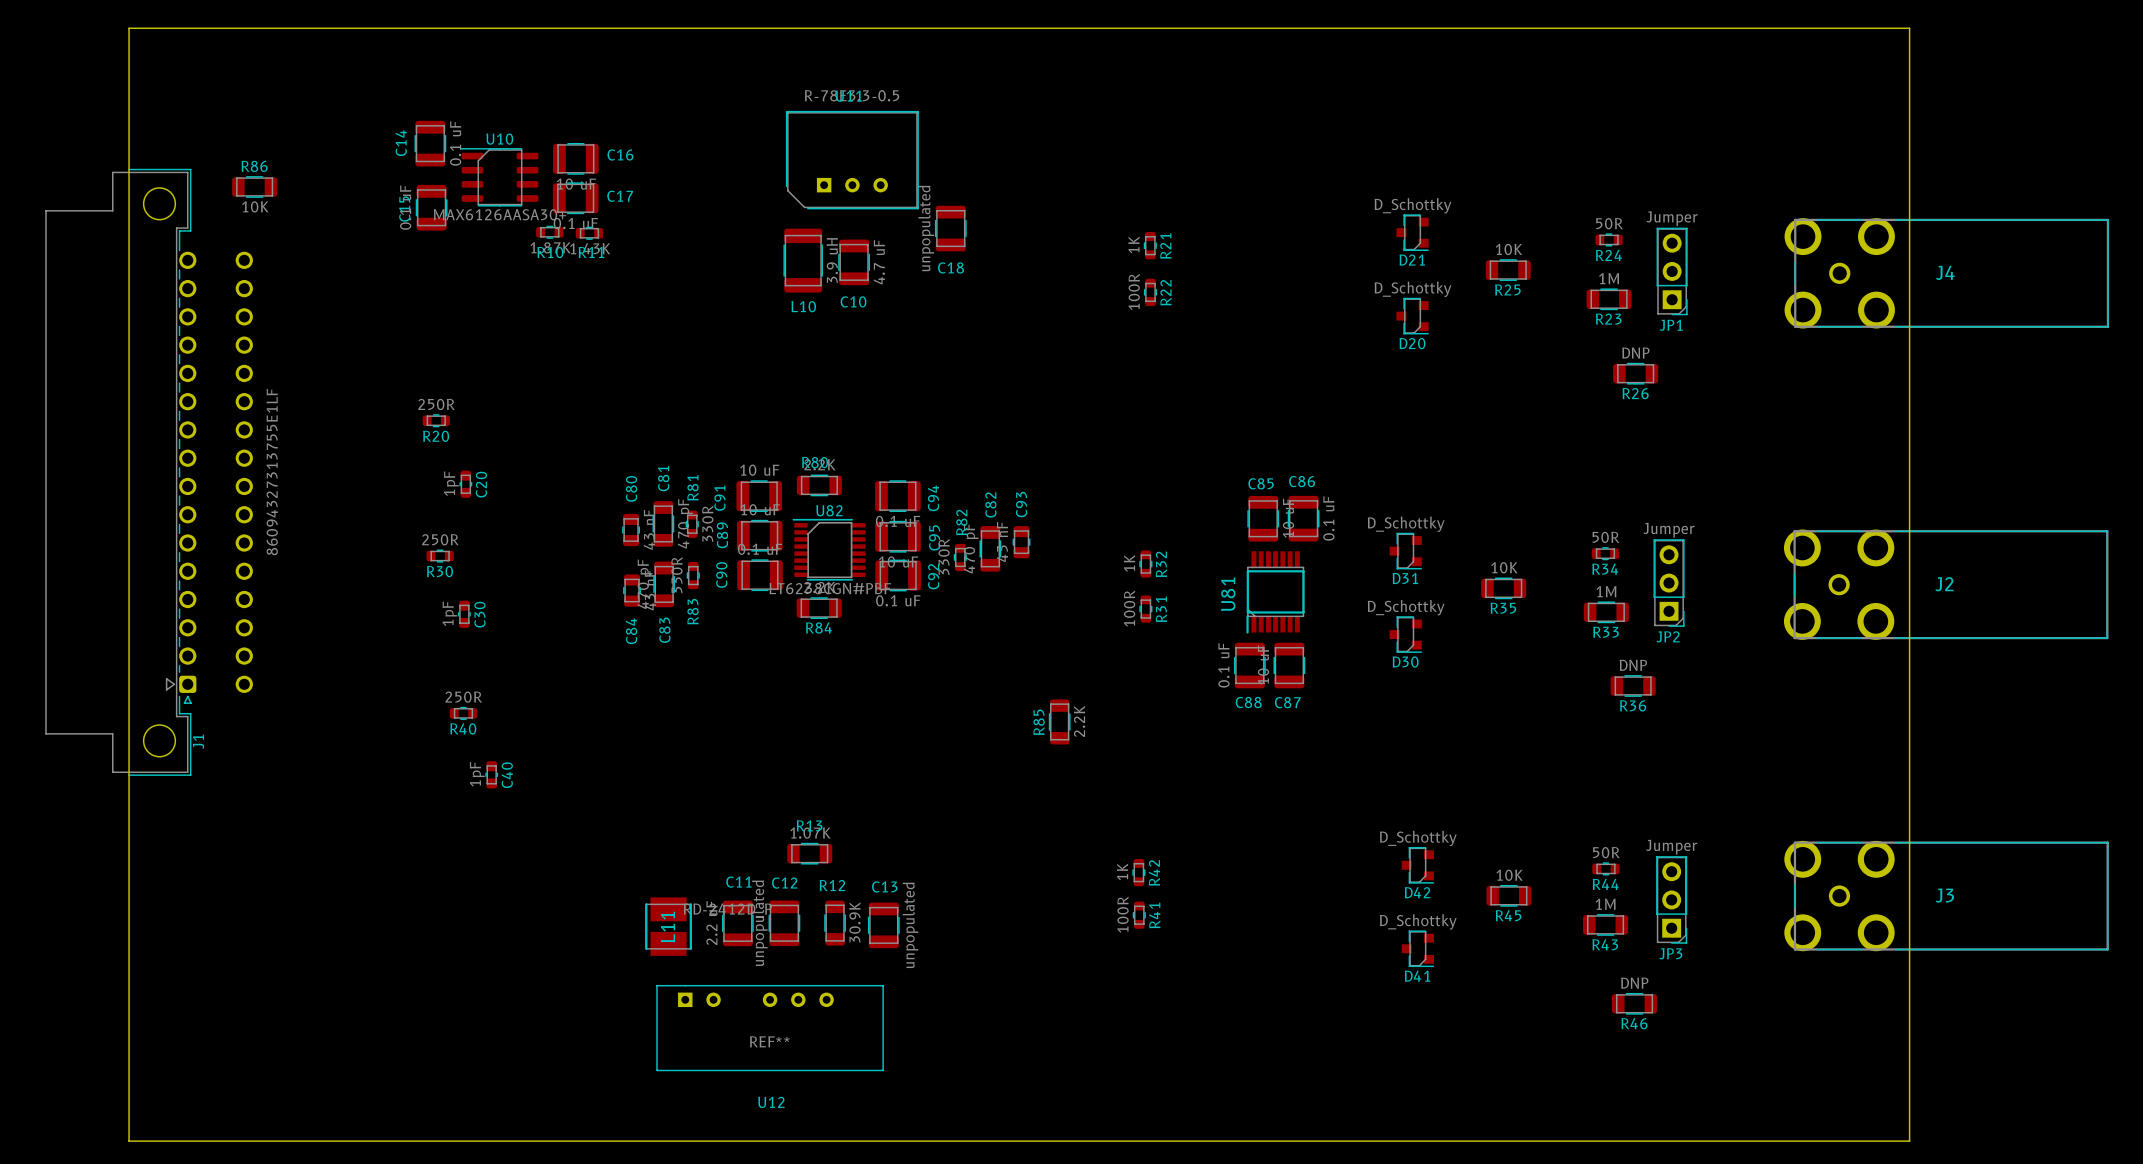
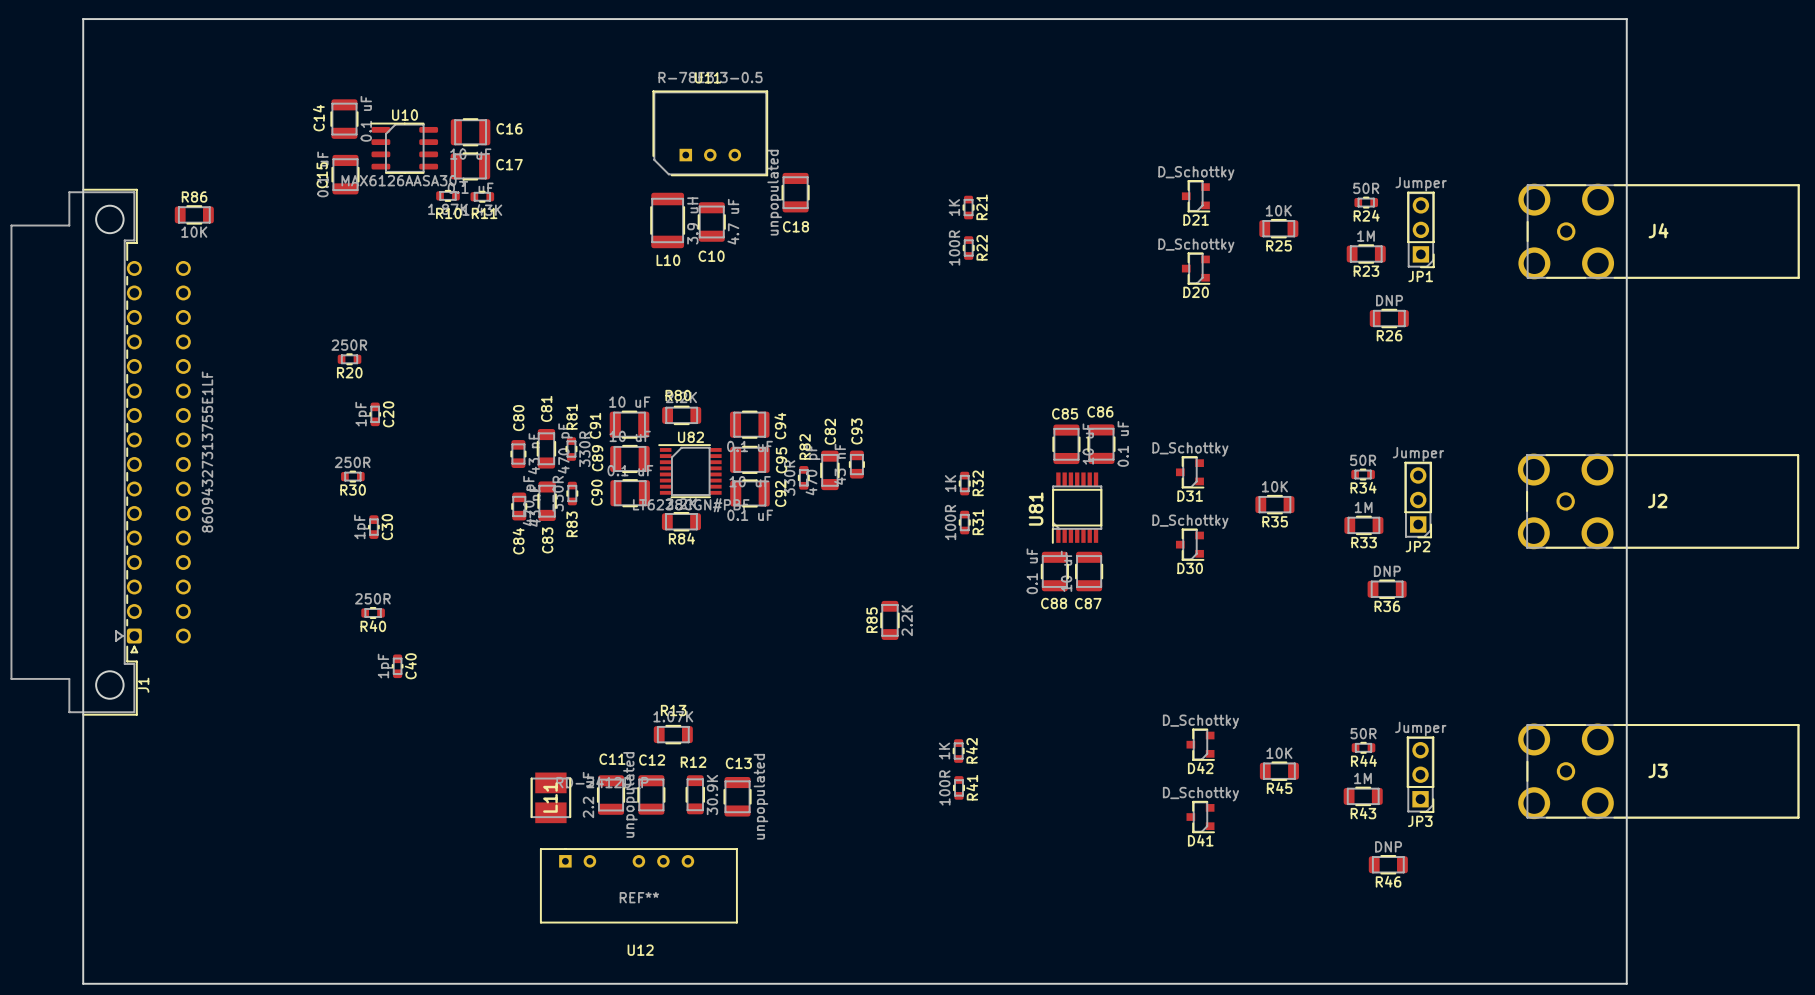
R86 position: (254, 186) -> (194, 214)
J1 position: (149, 472) -> (100, 452)

